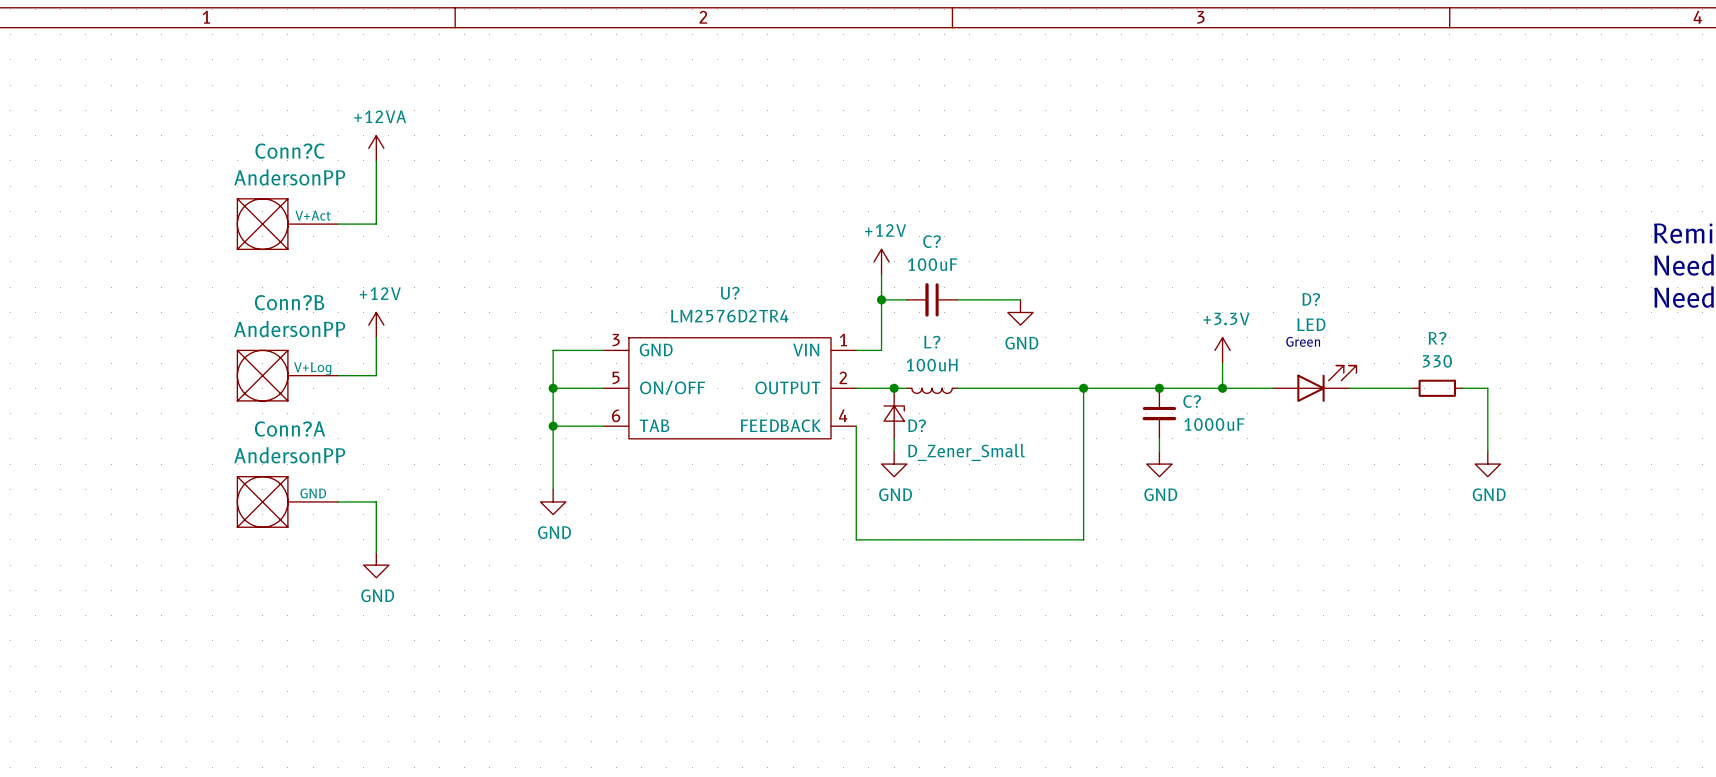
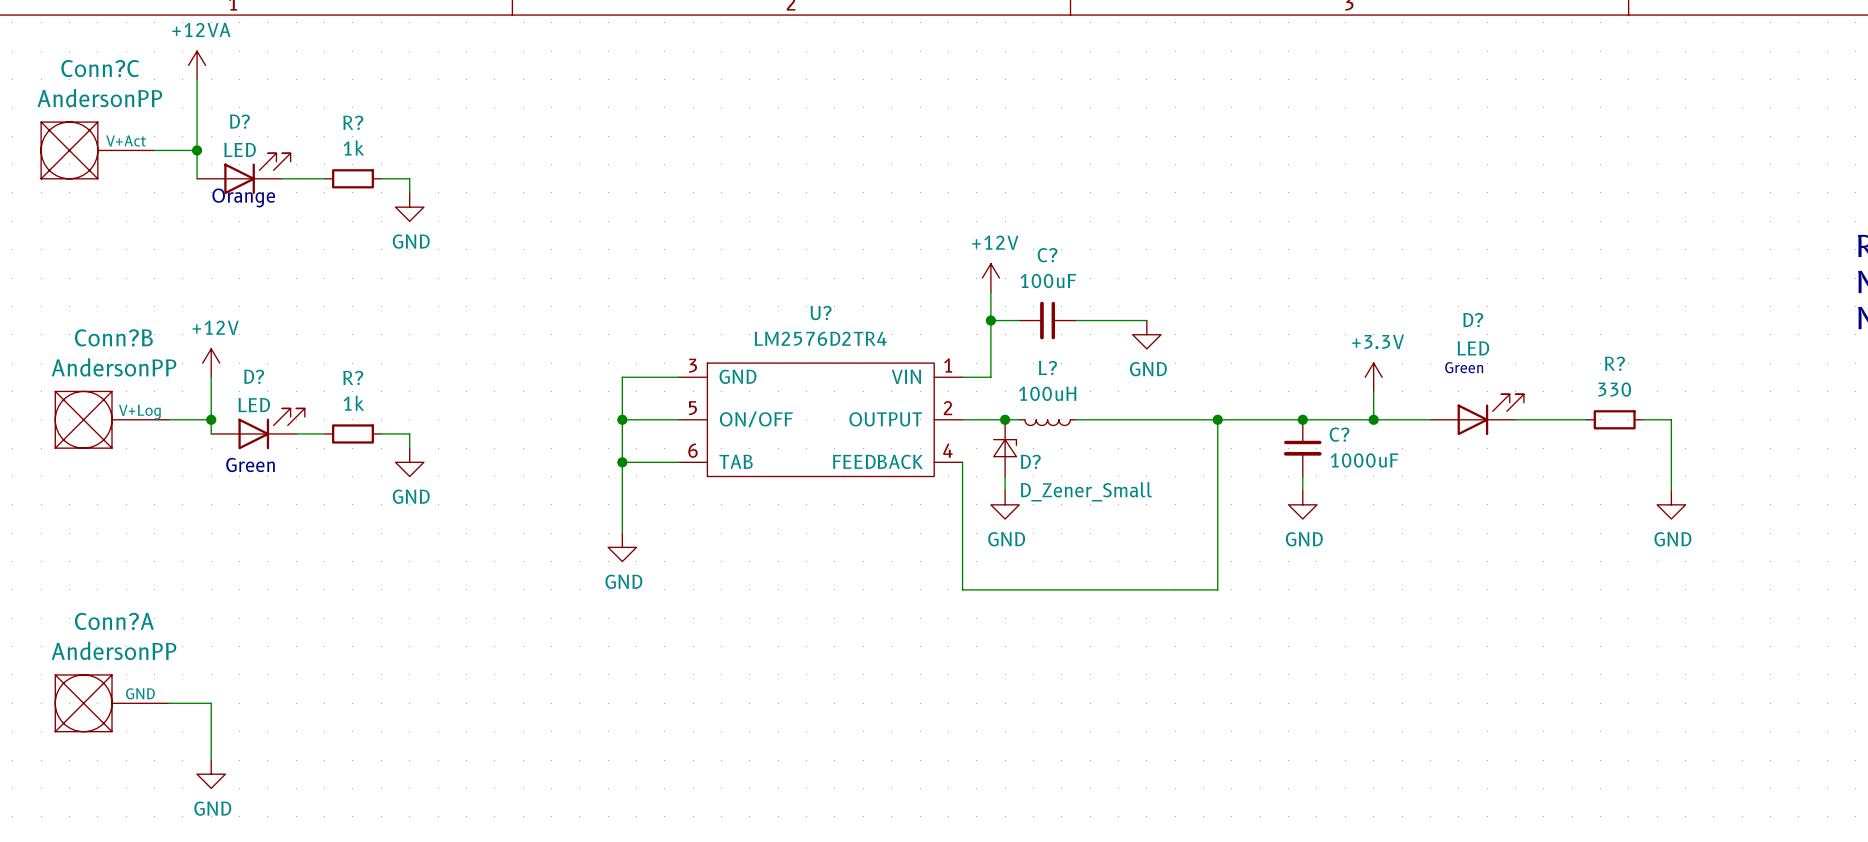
wire: none -> (197, 79) (197, 178)
wire: none -> (154, 150) (197, 150)
junction: none -> (197, 150)
power symbol position: +12VA (376, 148) -> +12VA (197, 65)
wire: (376, 160) (376, 224) (338, 224) -> none
D?: none -> LED (243, 173)
wire: none -> (282, 178) (324, 178)
R?: none -> 1k (352, 178)
wire: none -> (381, 178) (409, 178) (409, 192)
text: none -> Orange (243, 197)
power symbol: none -> GND (409, 207)
Conn?C position: (287, 224) -> (97, 150)
power symbol position: +12V (376, 325) -> +12V (211, 363)
wire: (376, 337) (376, 375) (338, 375) -> none
wire: none -> (211, 377) (211, 433)
Conn?B position: (287, 375) -> (112, 419)
wire: none -> (168, 419) (211, 419)
junction: none -> (211, 419)
D?: none -> LED (258, 428)
R?: none -> 1k (352, 433)
wire: none -> (381, 433) (409, 433) (409, 448)
power symbol: none -> GND (409, 462)
text: none -> Green (250, 464)
Conn?A position: (287, 501) -> (112, 703)
wire: (338, 501) (376, 501) (376, 552) -> (168, 703) (211, 703) (211, 760)
power symbol: GND (376, 565) -> none
power symbol: none -> GND (211, 774)

